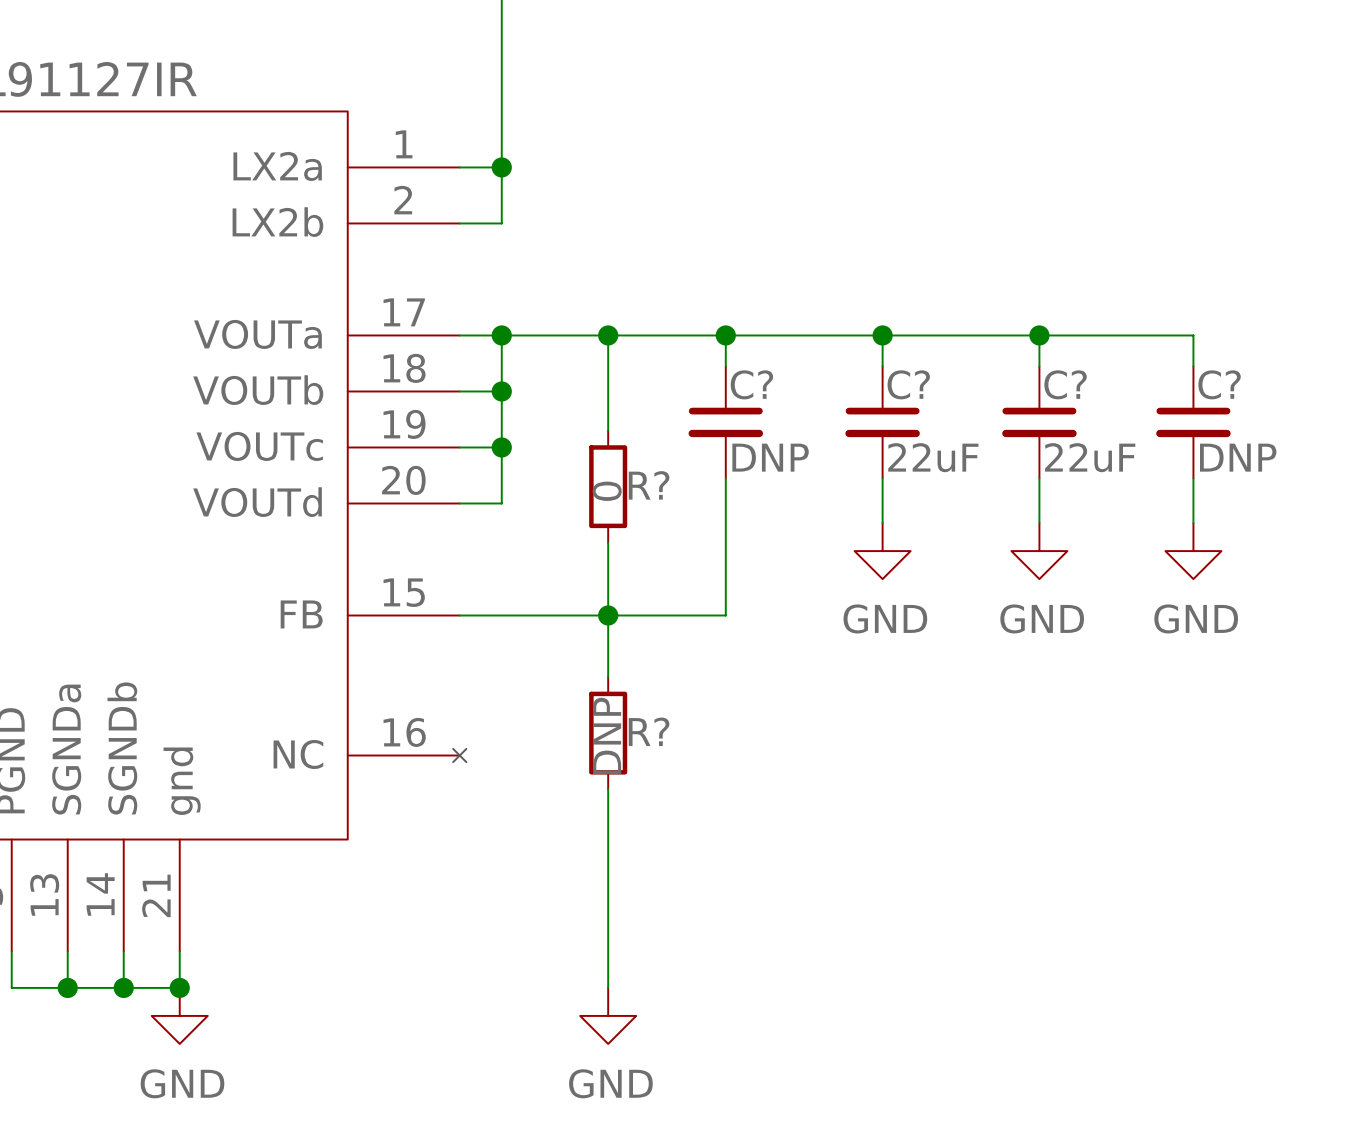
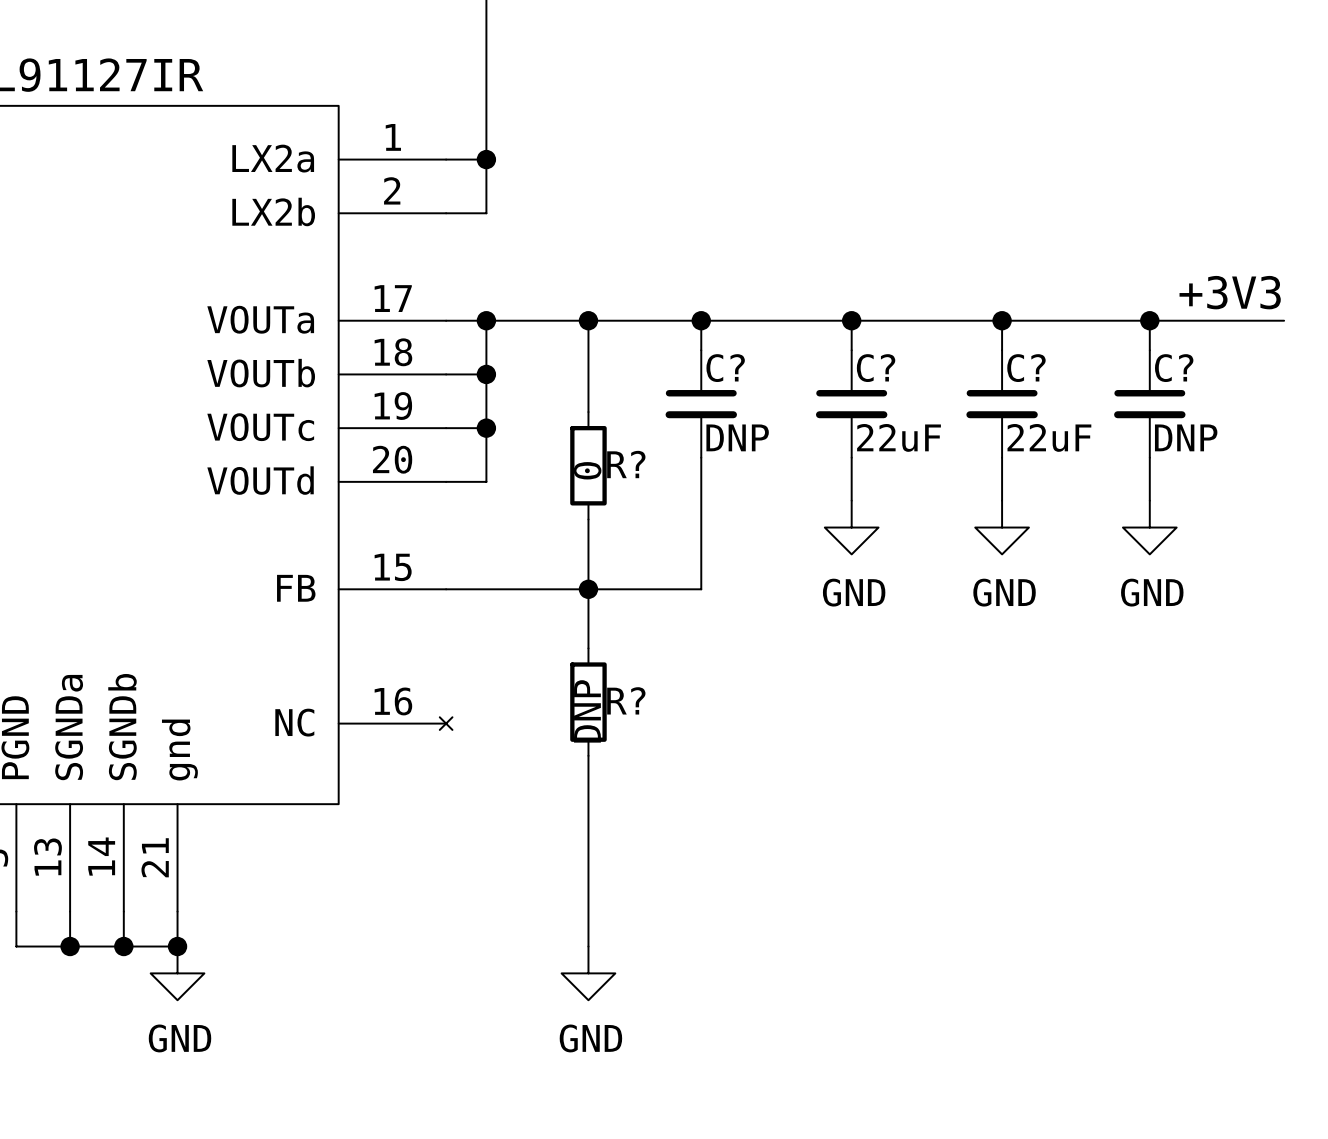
label: none -> +3V3 (1230, 292)
wire: none -> (1149, 320) (1284, 320)
junction: none -> (1149, 320)

